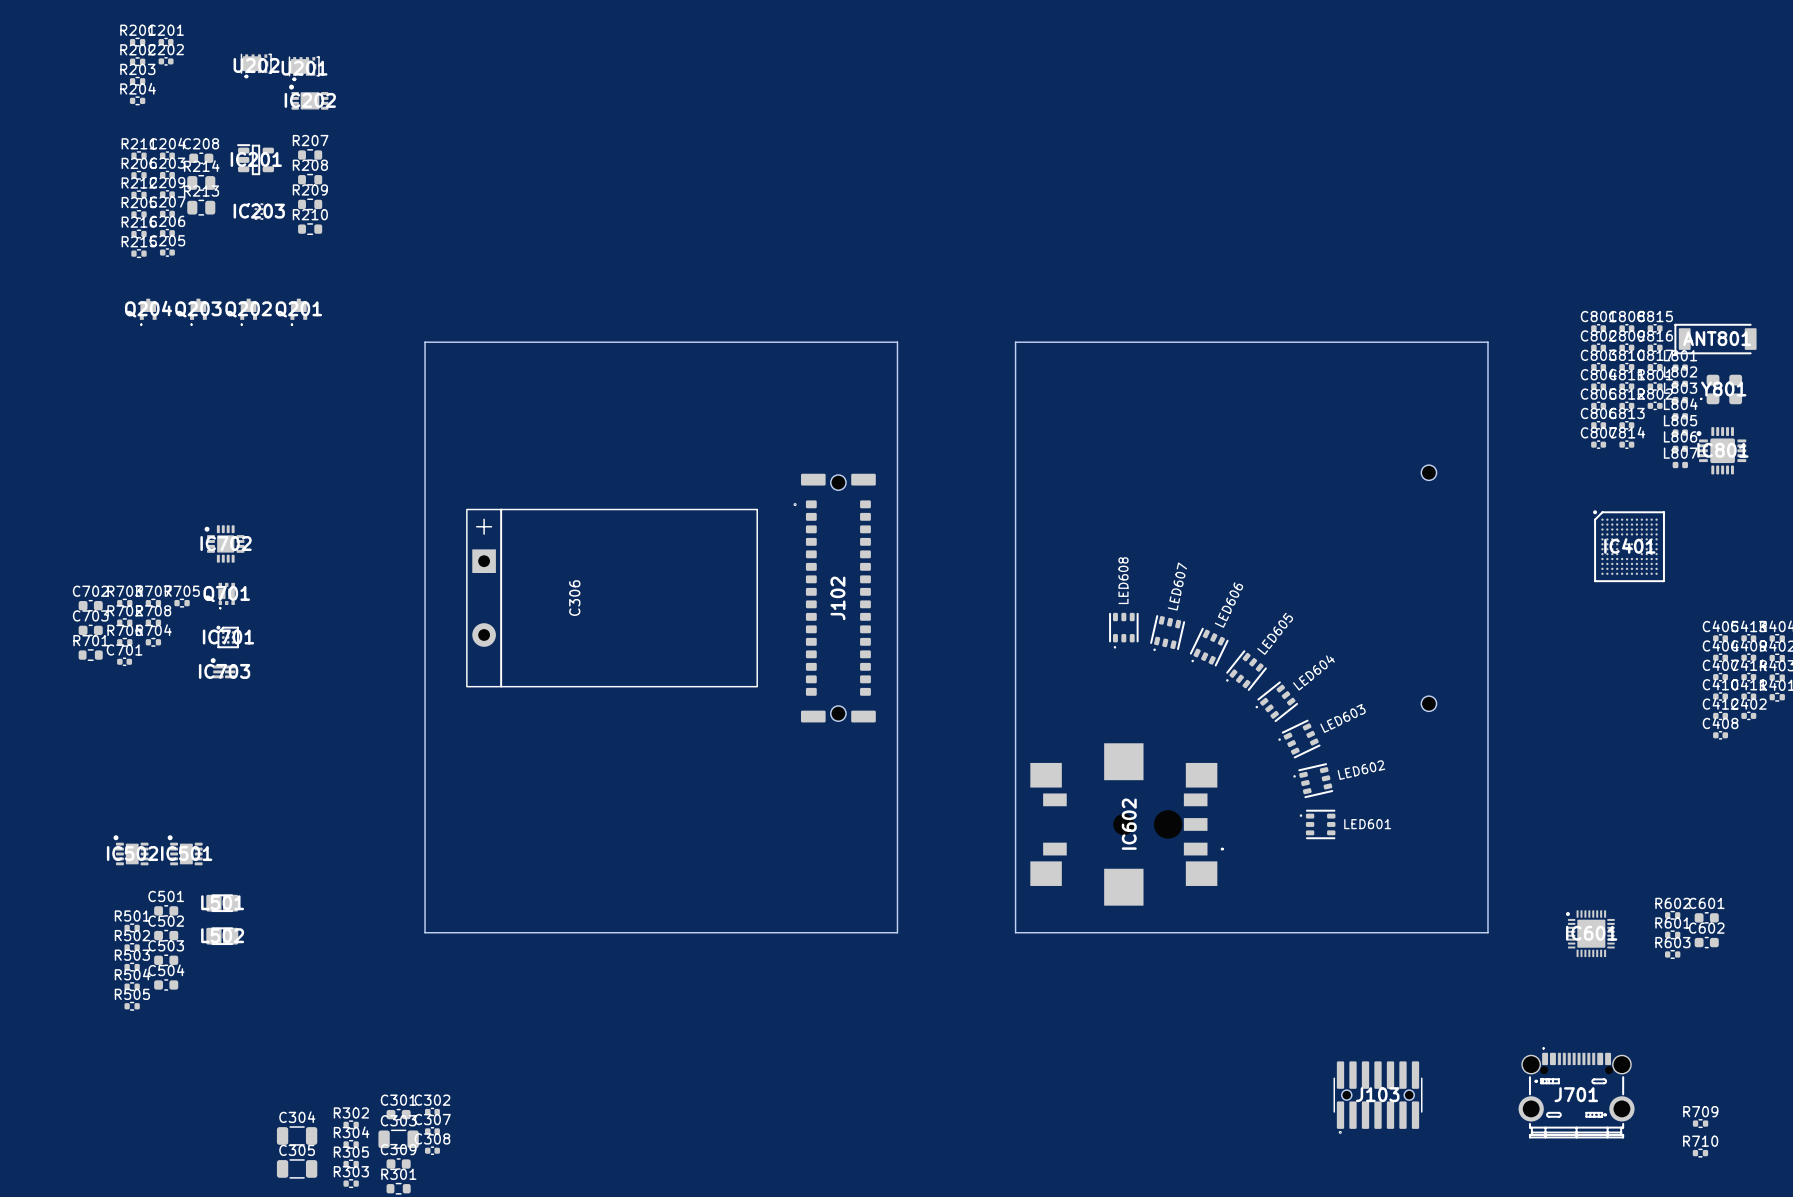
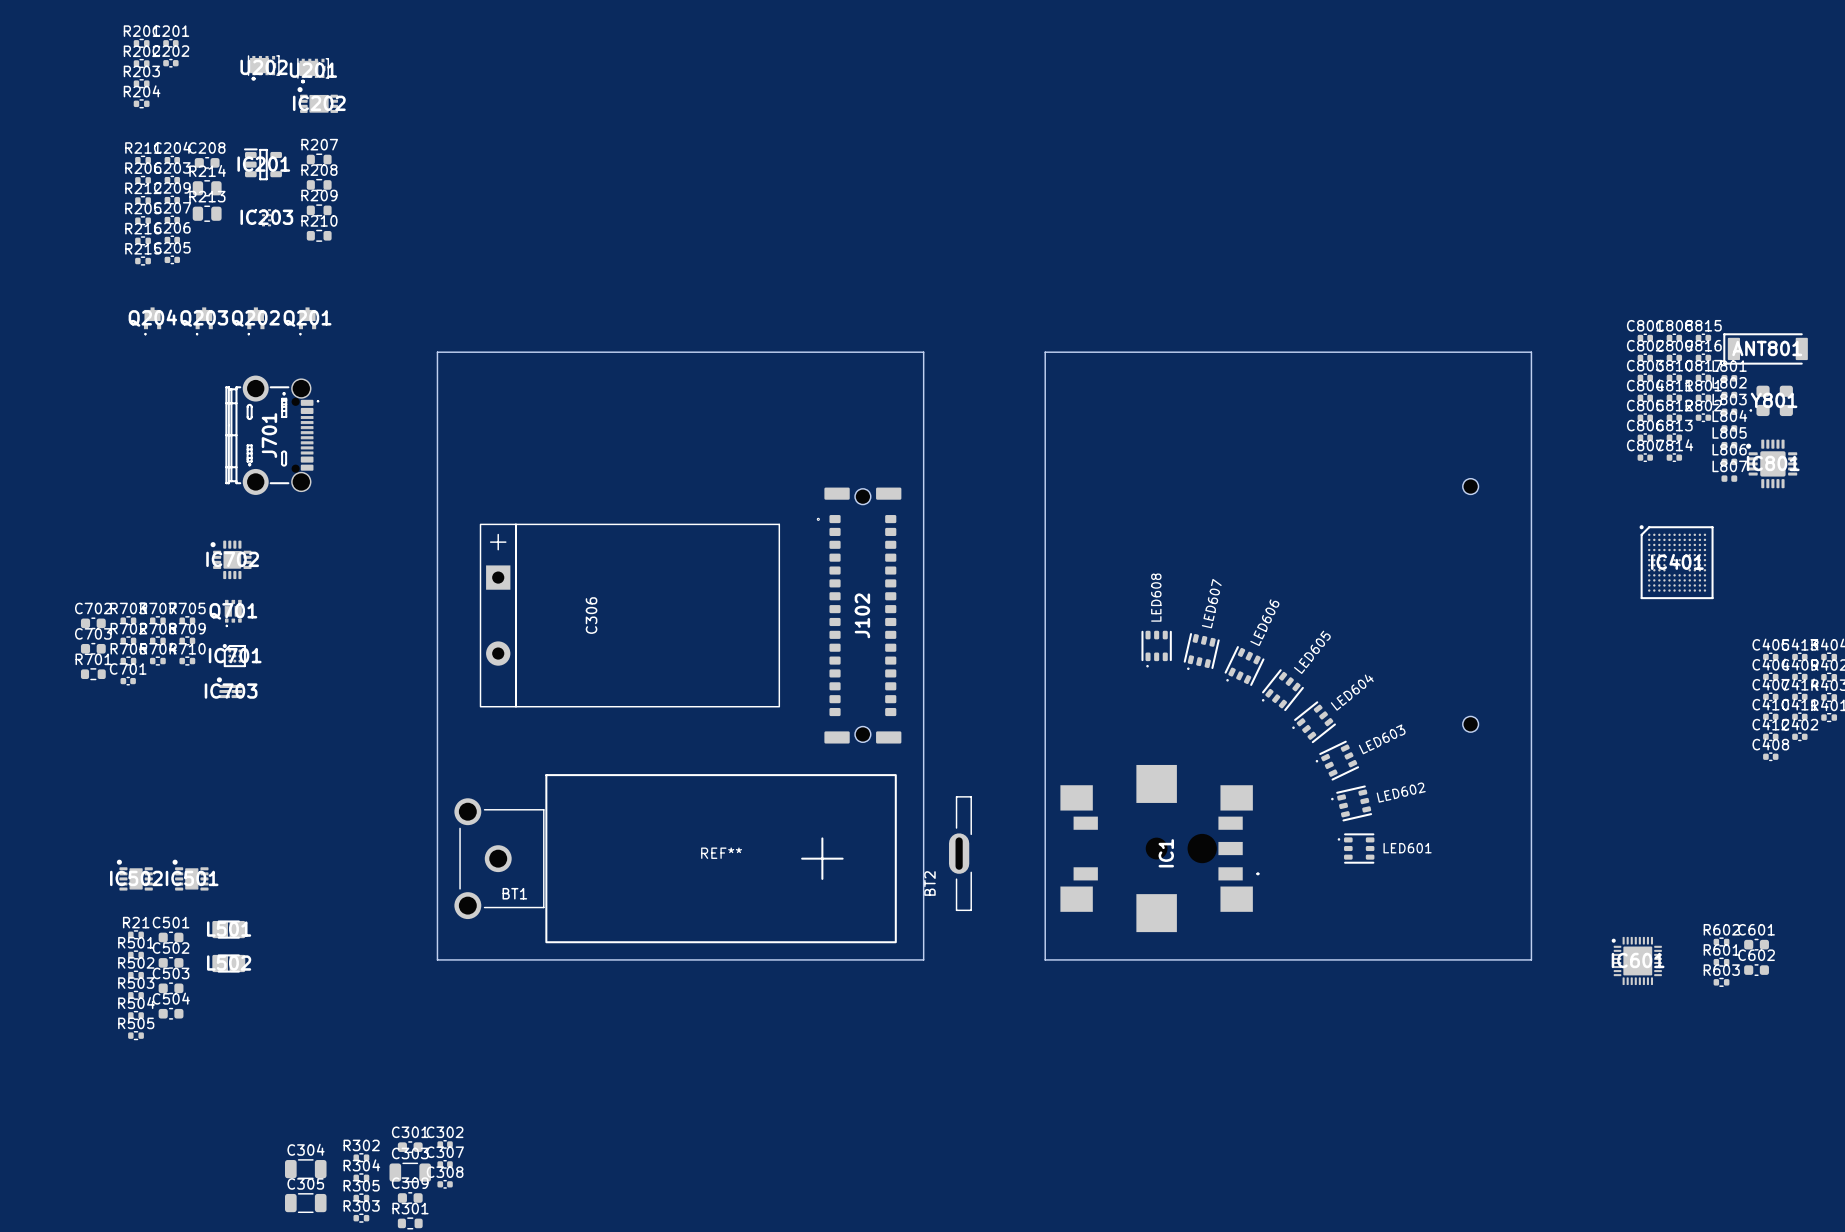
IC602 name: IC602 (1129, 824) -> IC1 (1166, 853)
BT2: none -> (960, 853)
BT1: none -> (499, 858)
REF**: none -> (721, 858)
R21: none -> (136, 934)
J701 rotation: 0° (1576, 1092) -> 90° clockwise (272, 435)
J701 position: (1576, 1092) -> (272, 435)
J103: (1378, 1097) -> none
R709 position: (1700, 1123) -> (187, 640)
R710 position: (1700, 1153) -> (187, 661)

